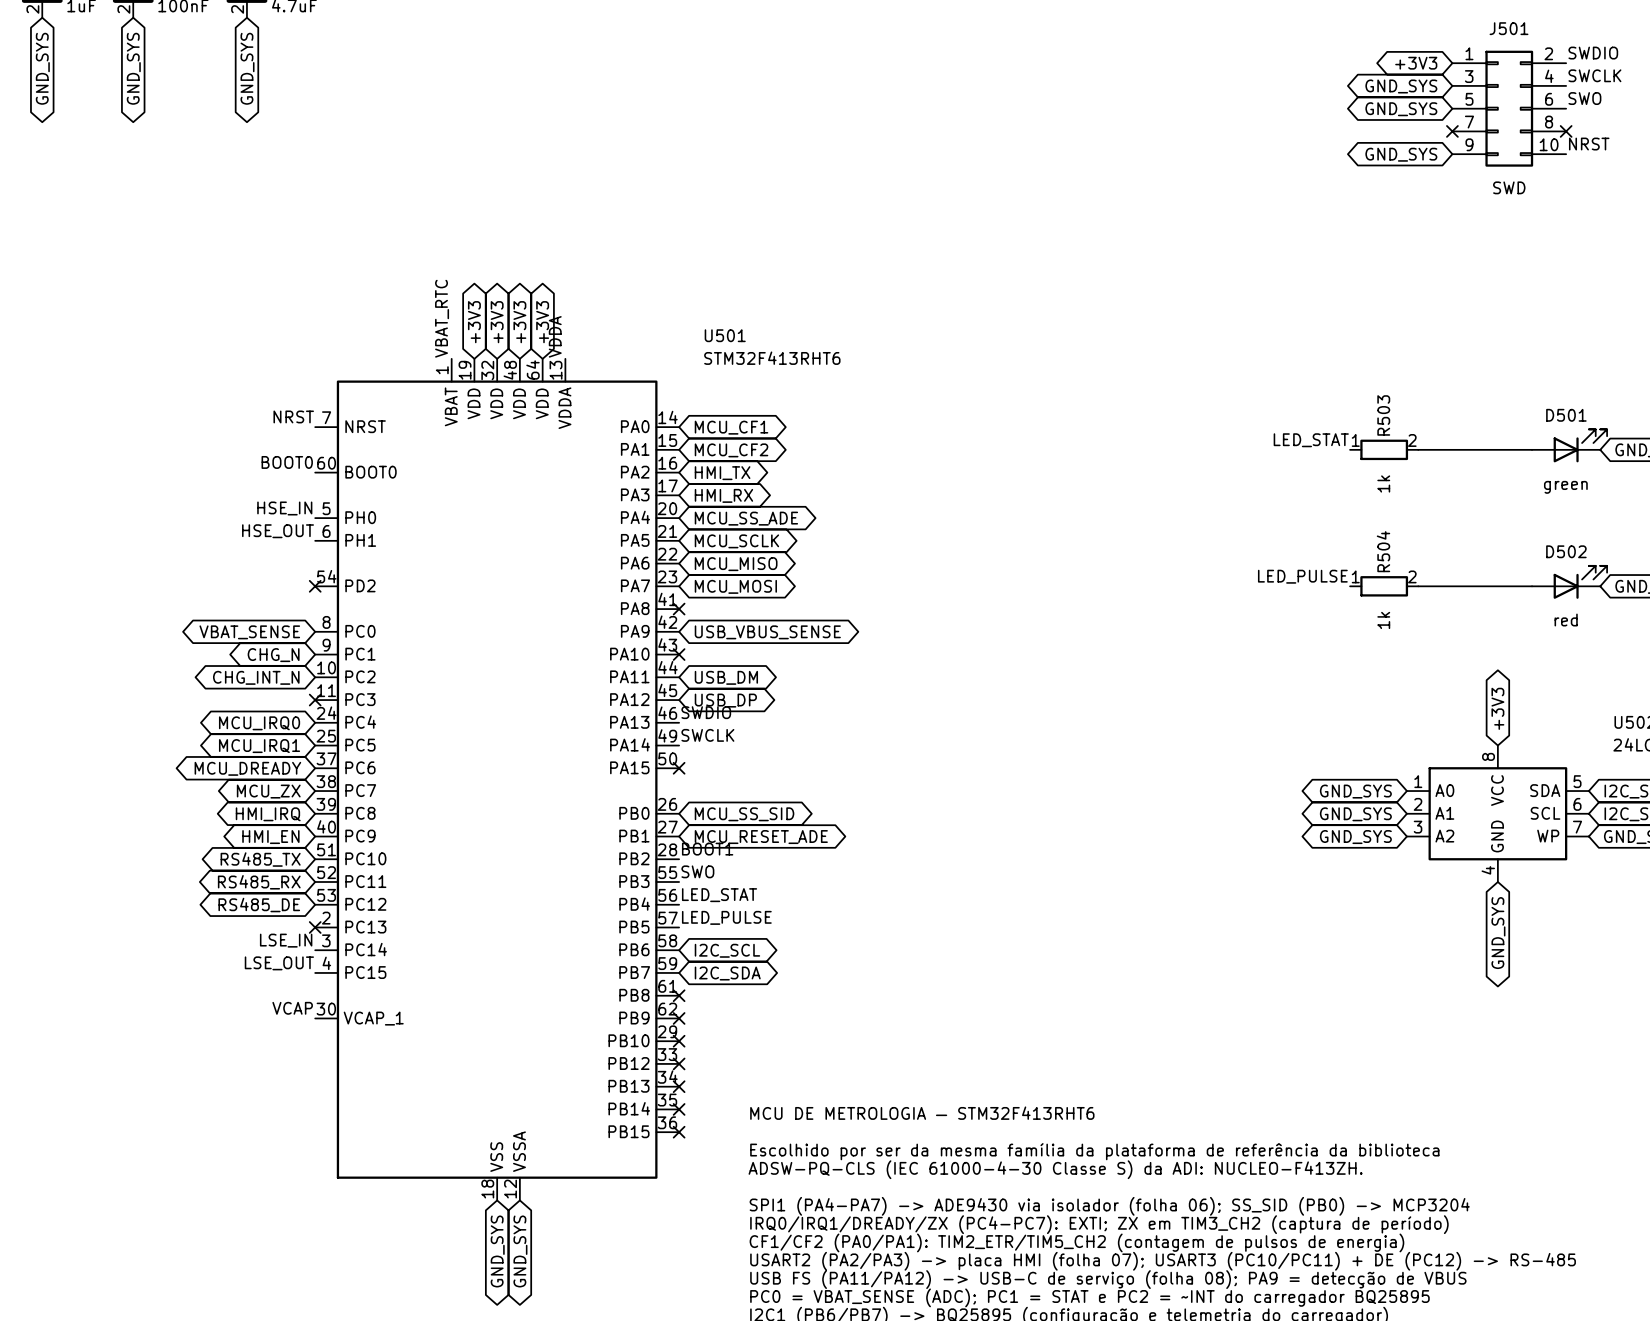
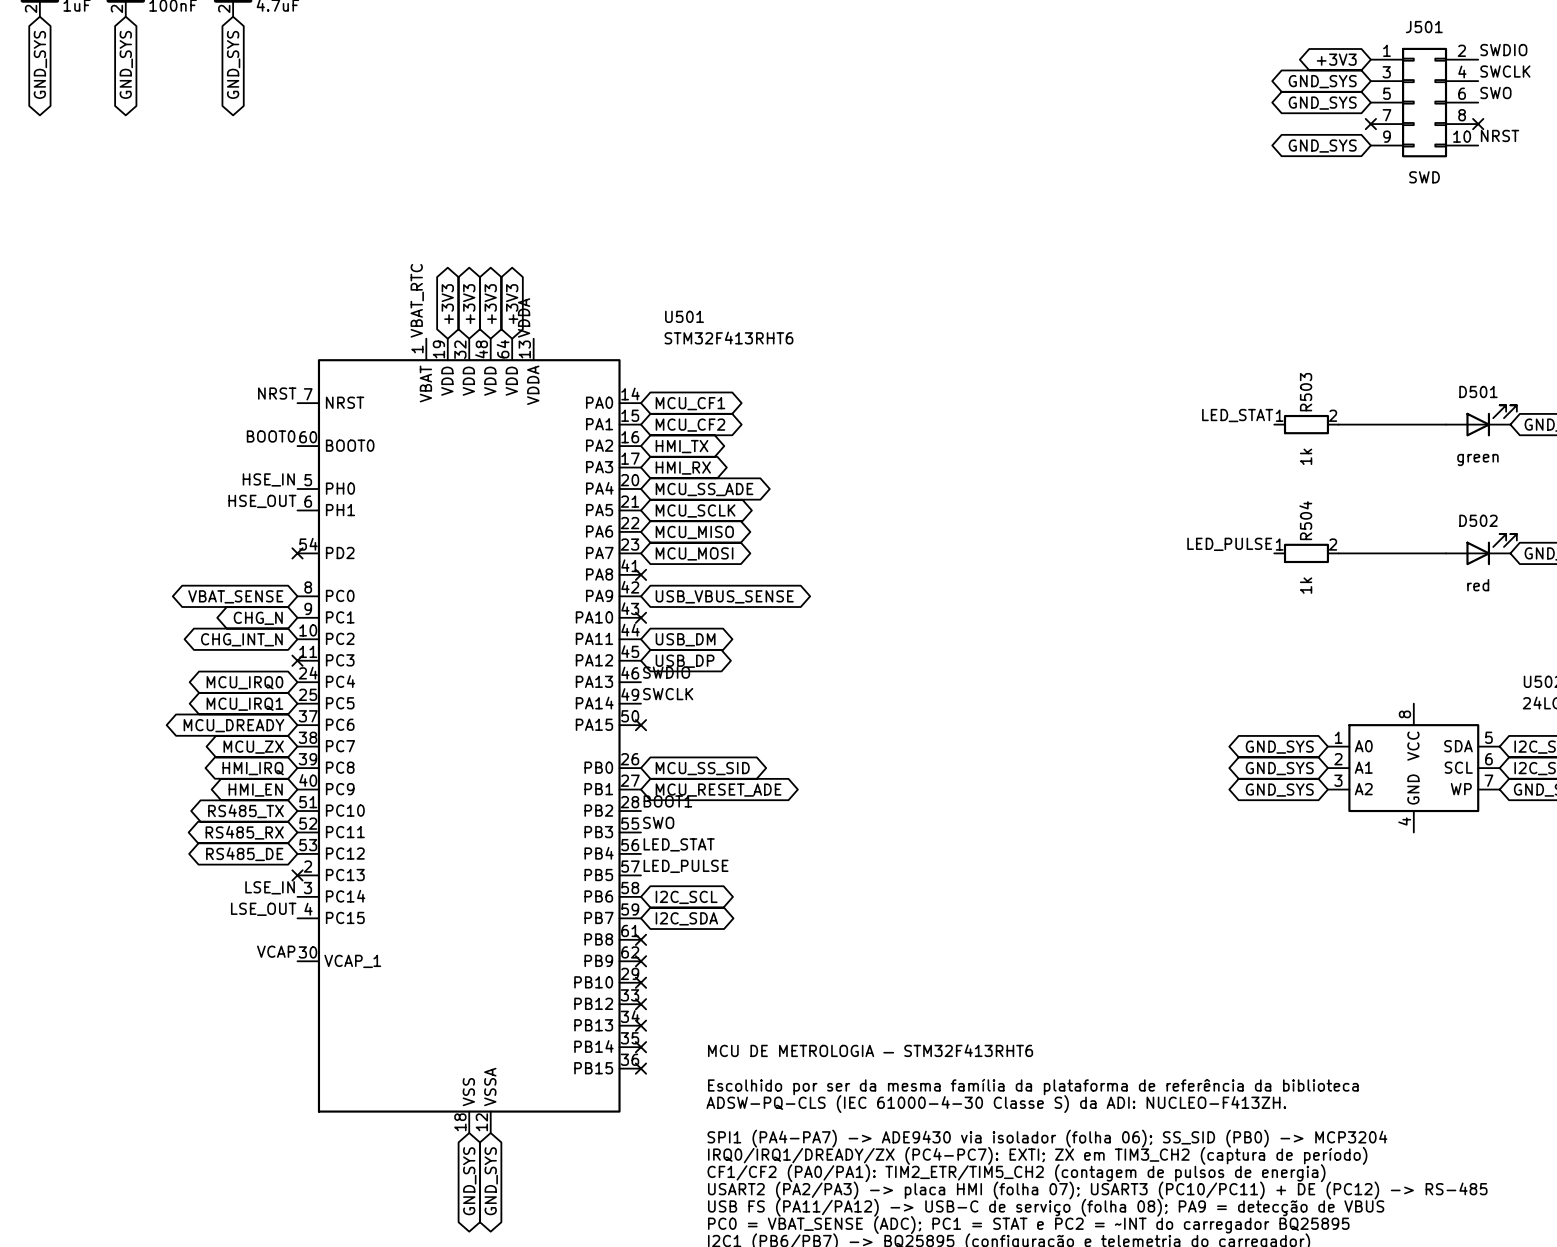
global label: +3V3 (1497, 708) -> none
global label: GND_SYS (1498, 933) -> none

